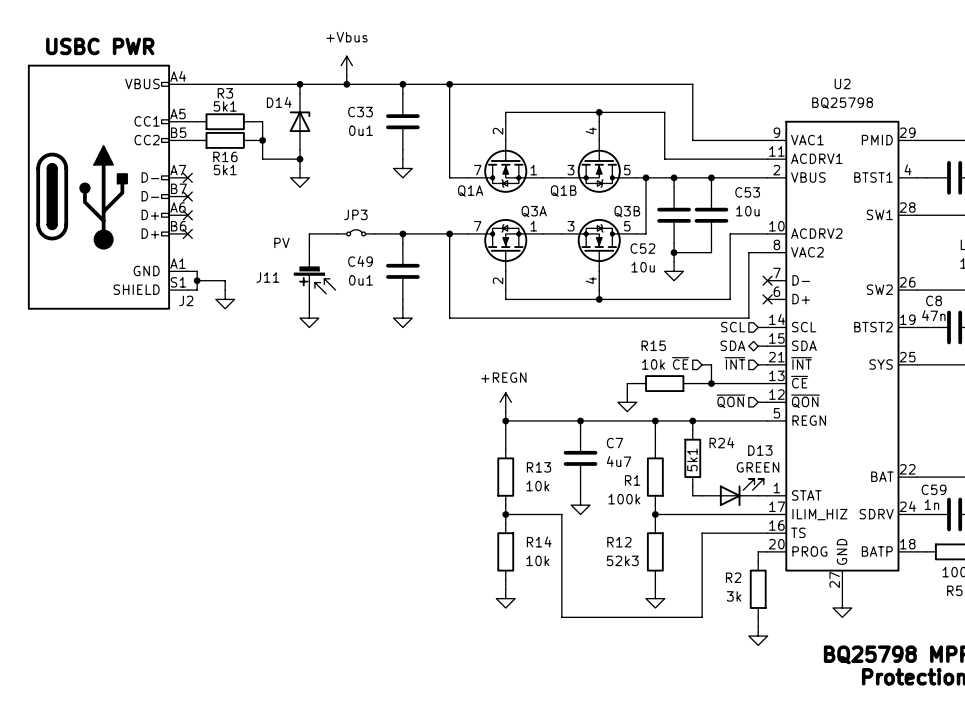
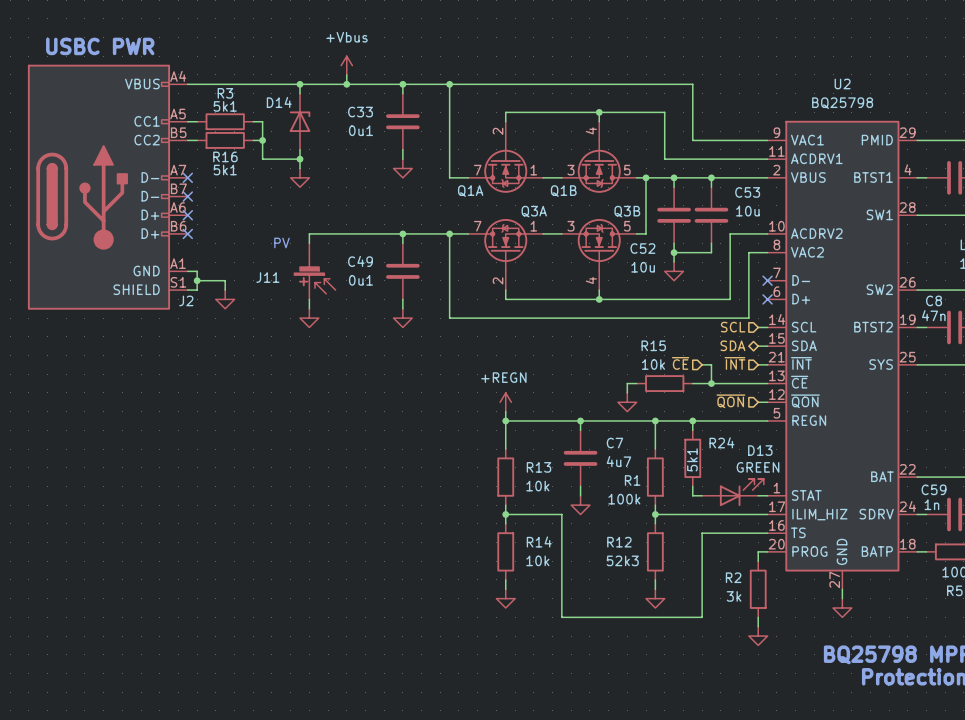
JP3: (356, 232) -> none

